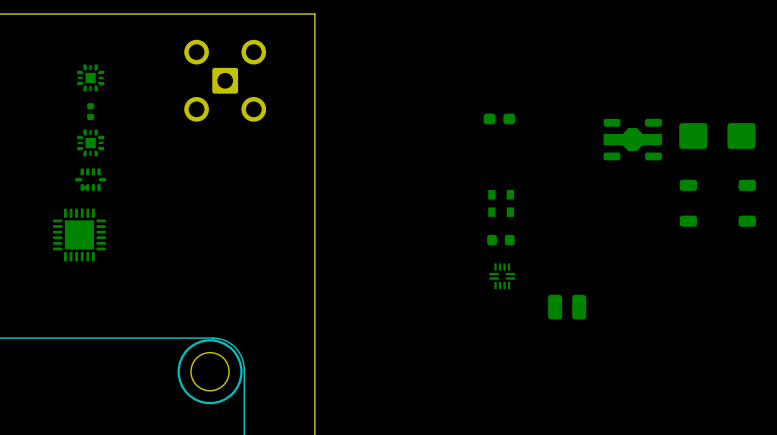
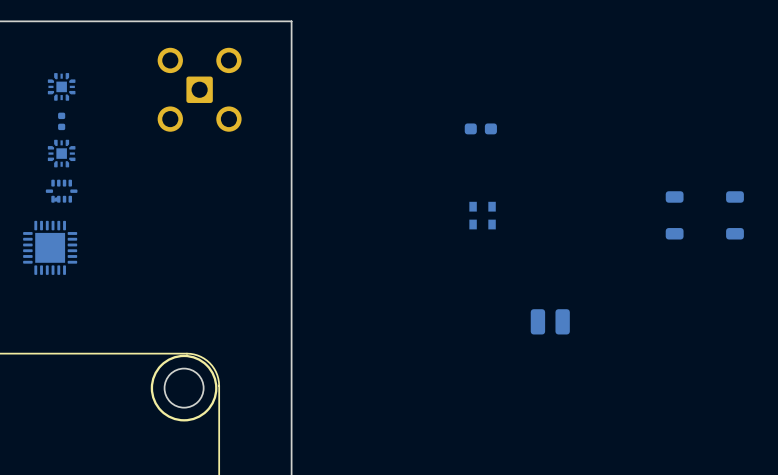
part: (717, 135) -> none
part: (632, 139) -> none
part: (500, 240) -> none
part: (502, 276) -> none

